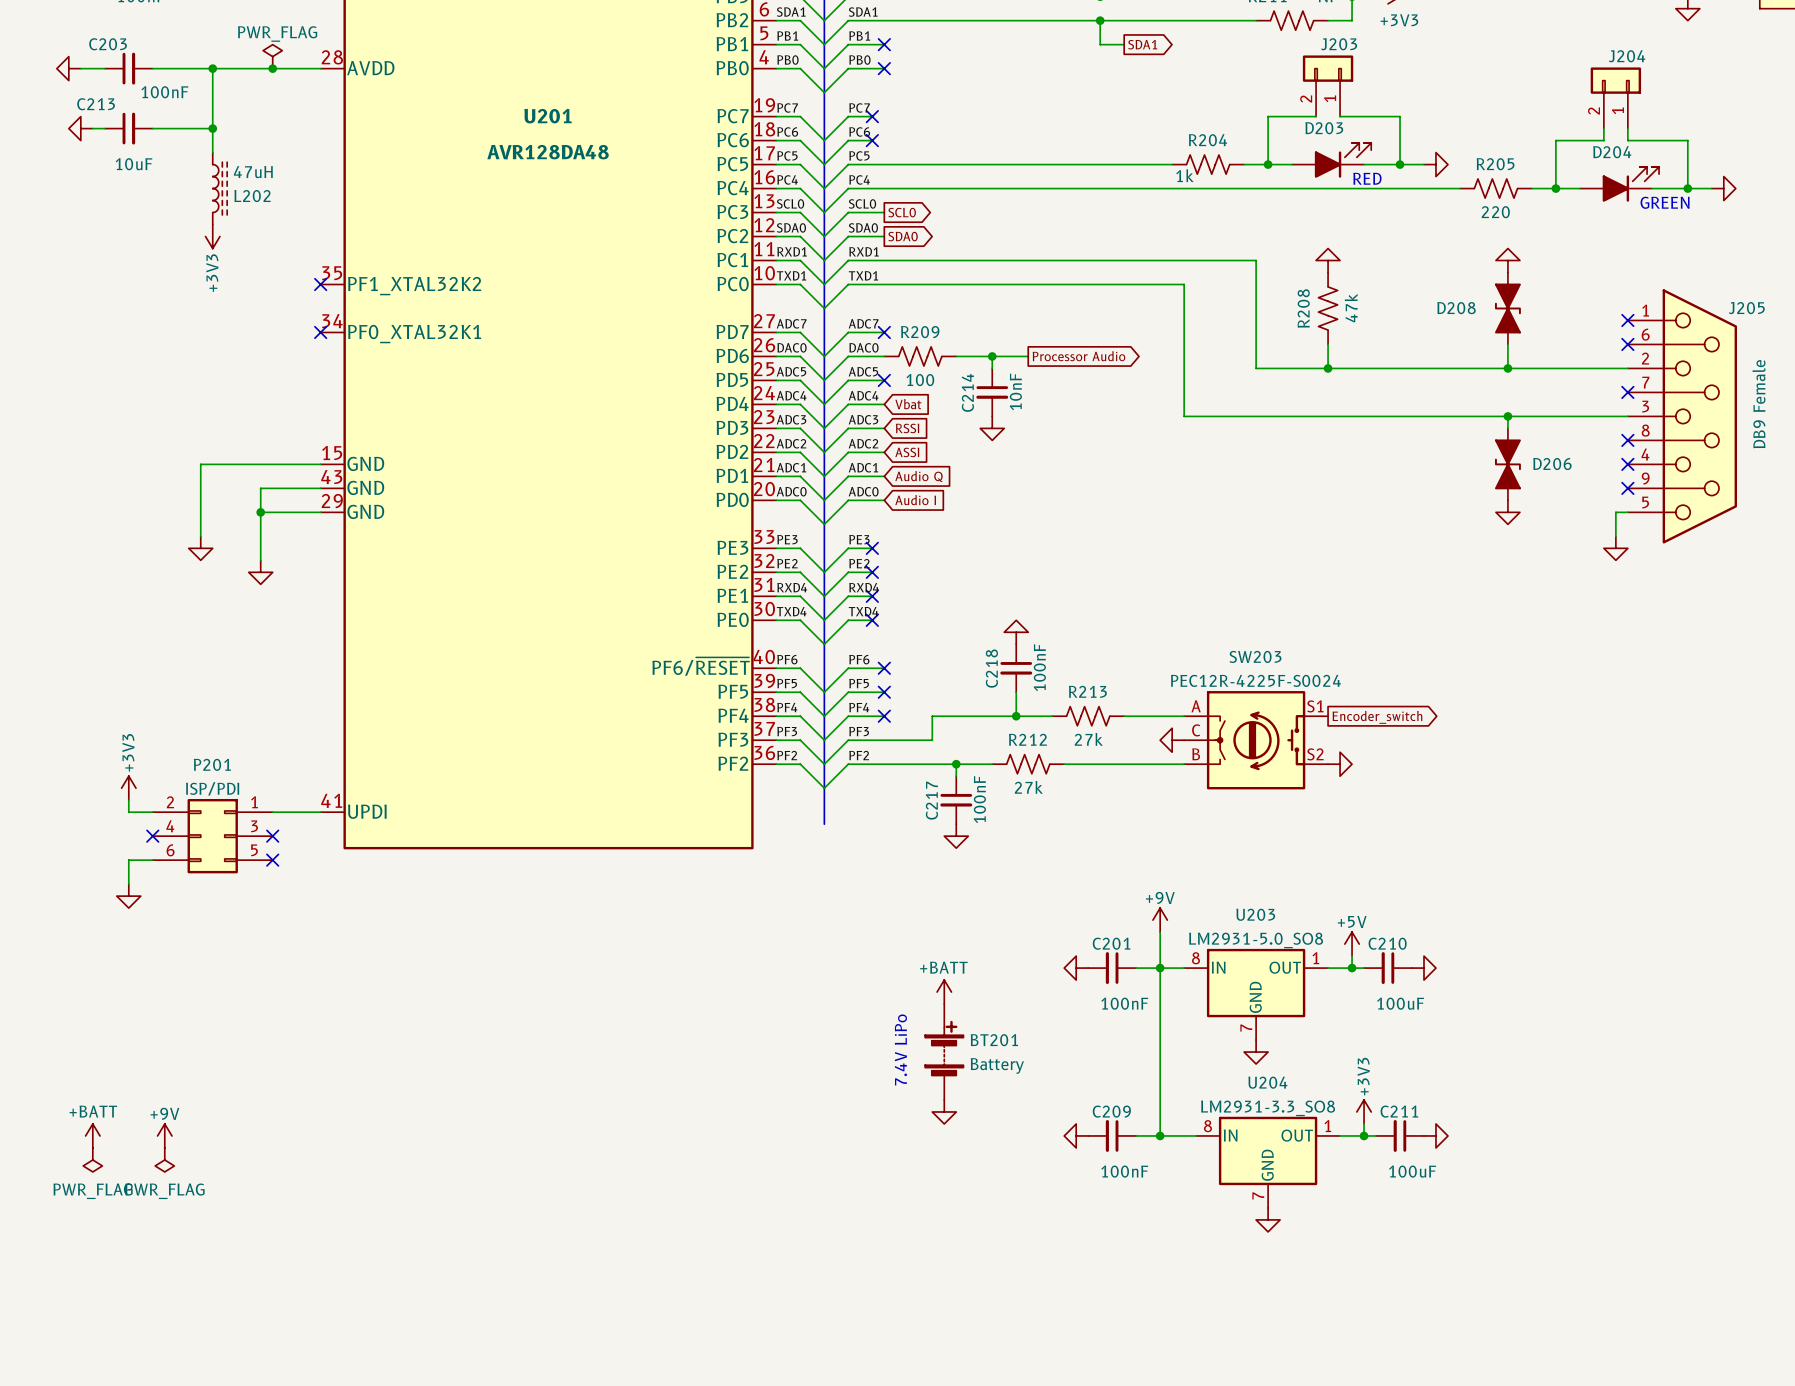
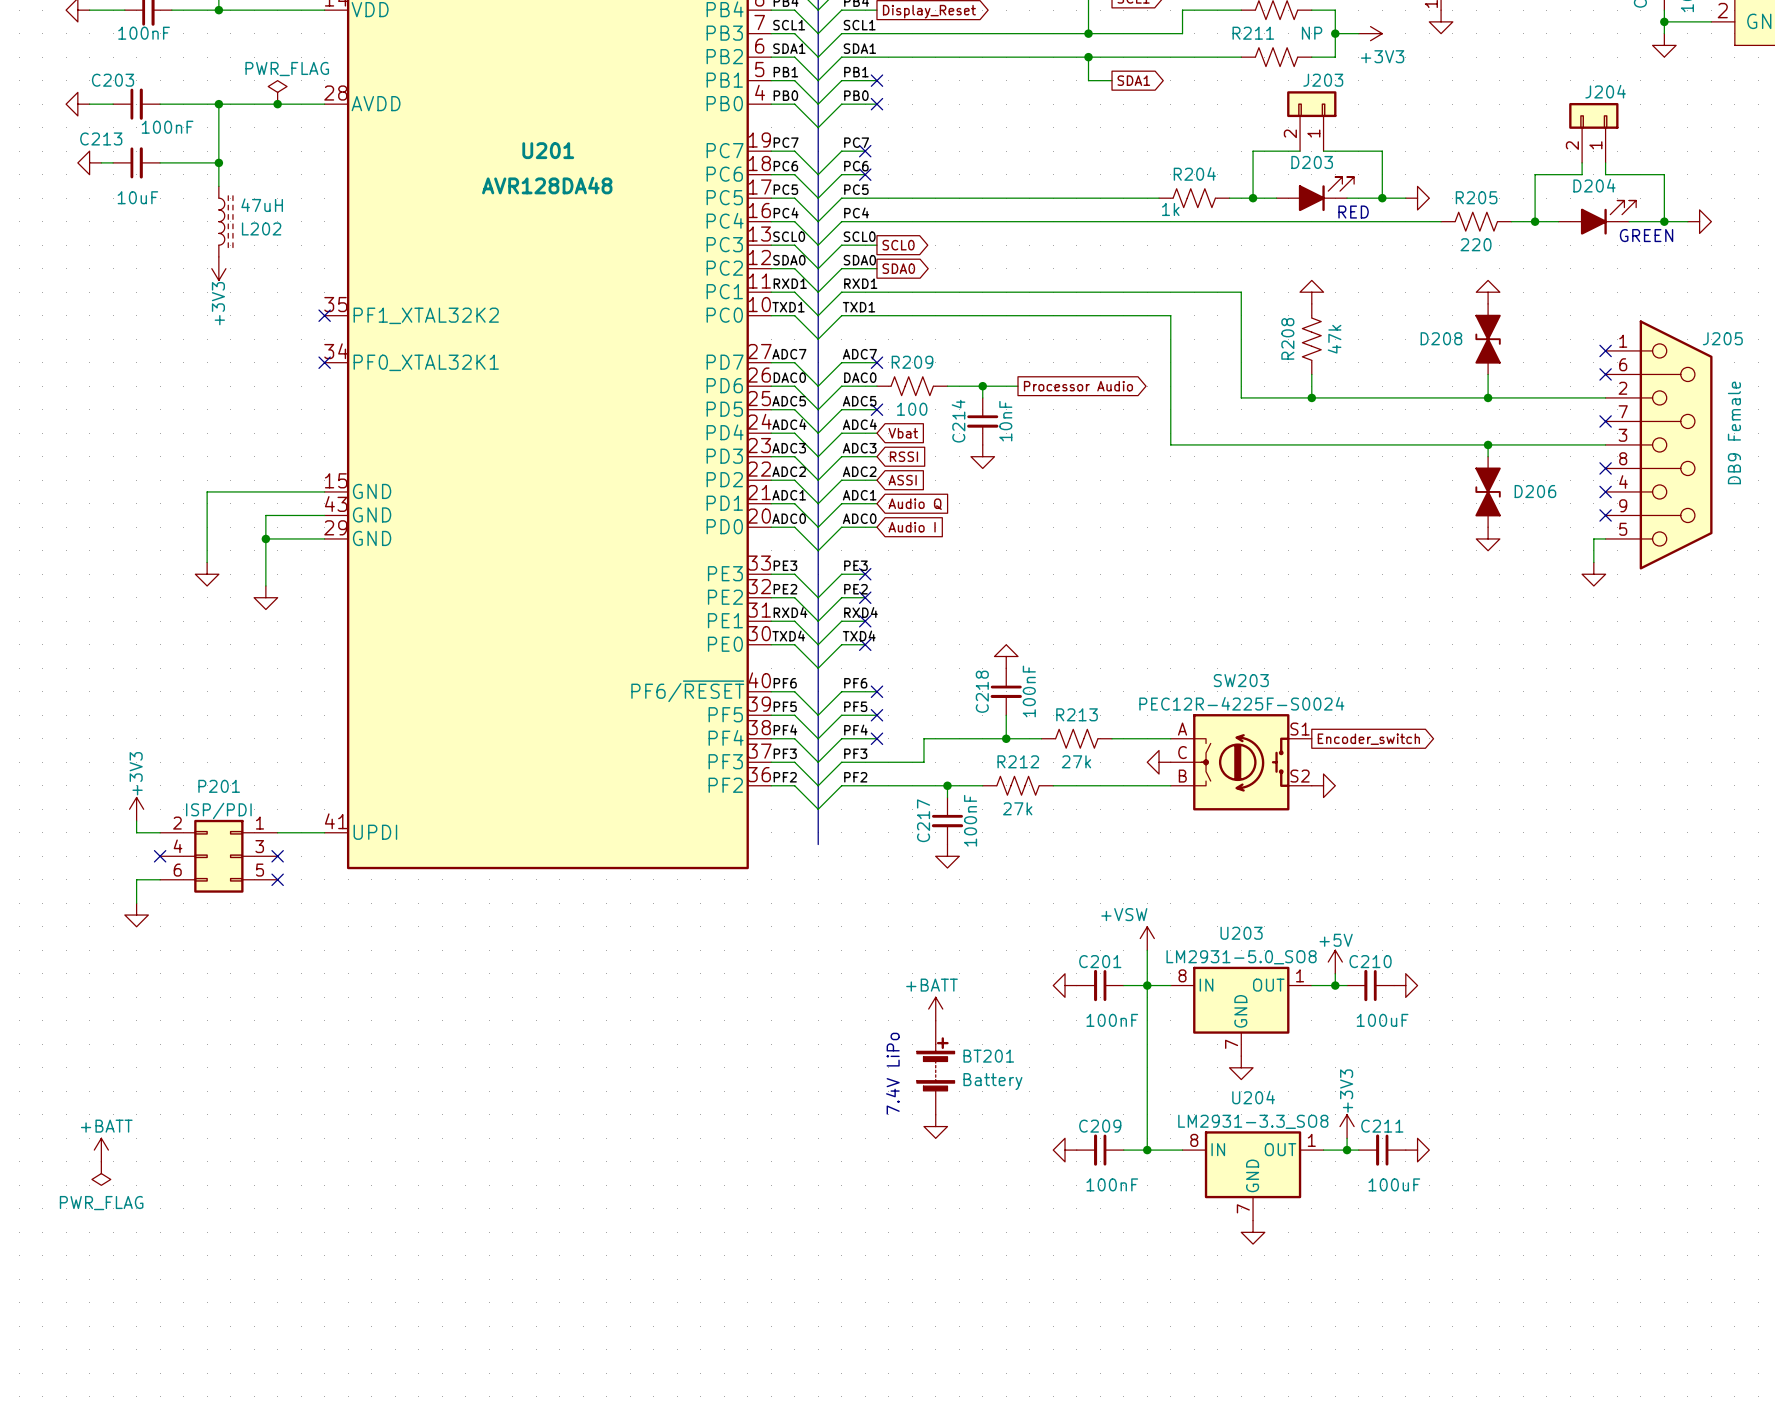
power symbol: +9V (1160, 920) -> +VSW (1147, 938)
power symbol: +9V (164, 1135) -> none
power symbol: PWR_FLAG (164, 1159) -> none

